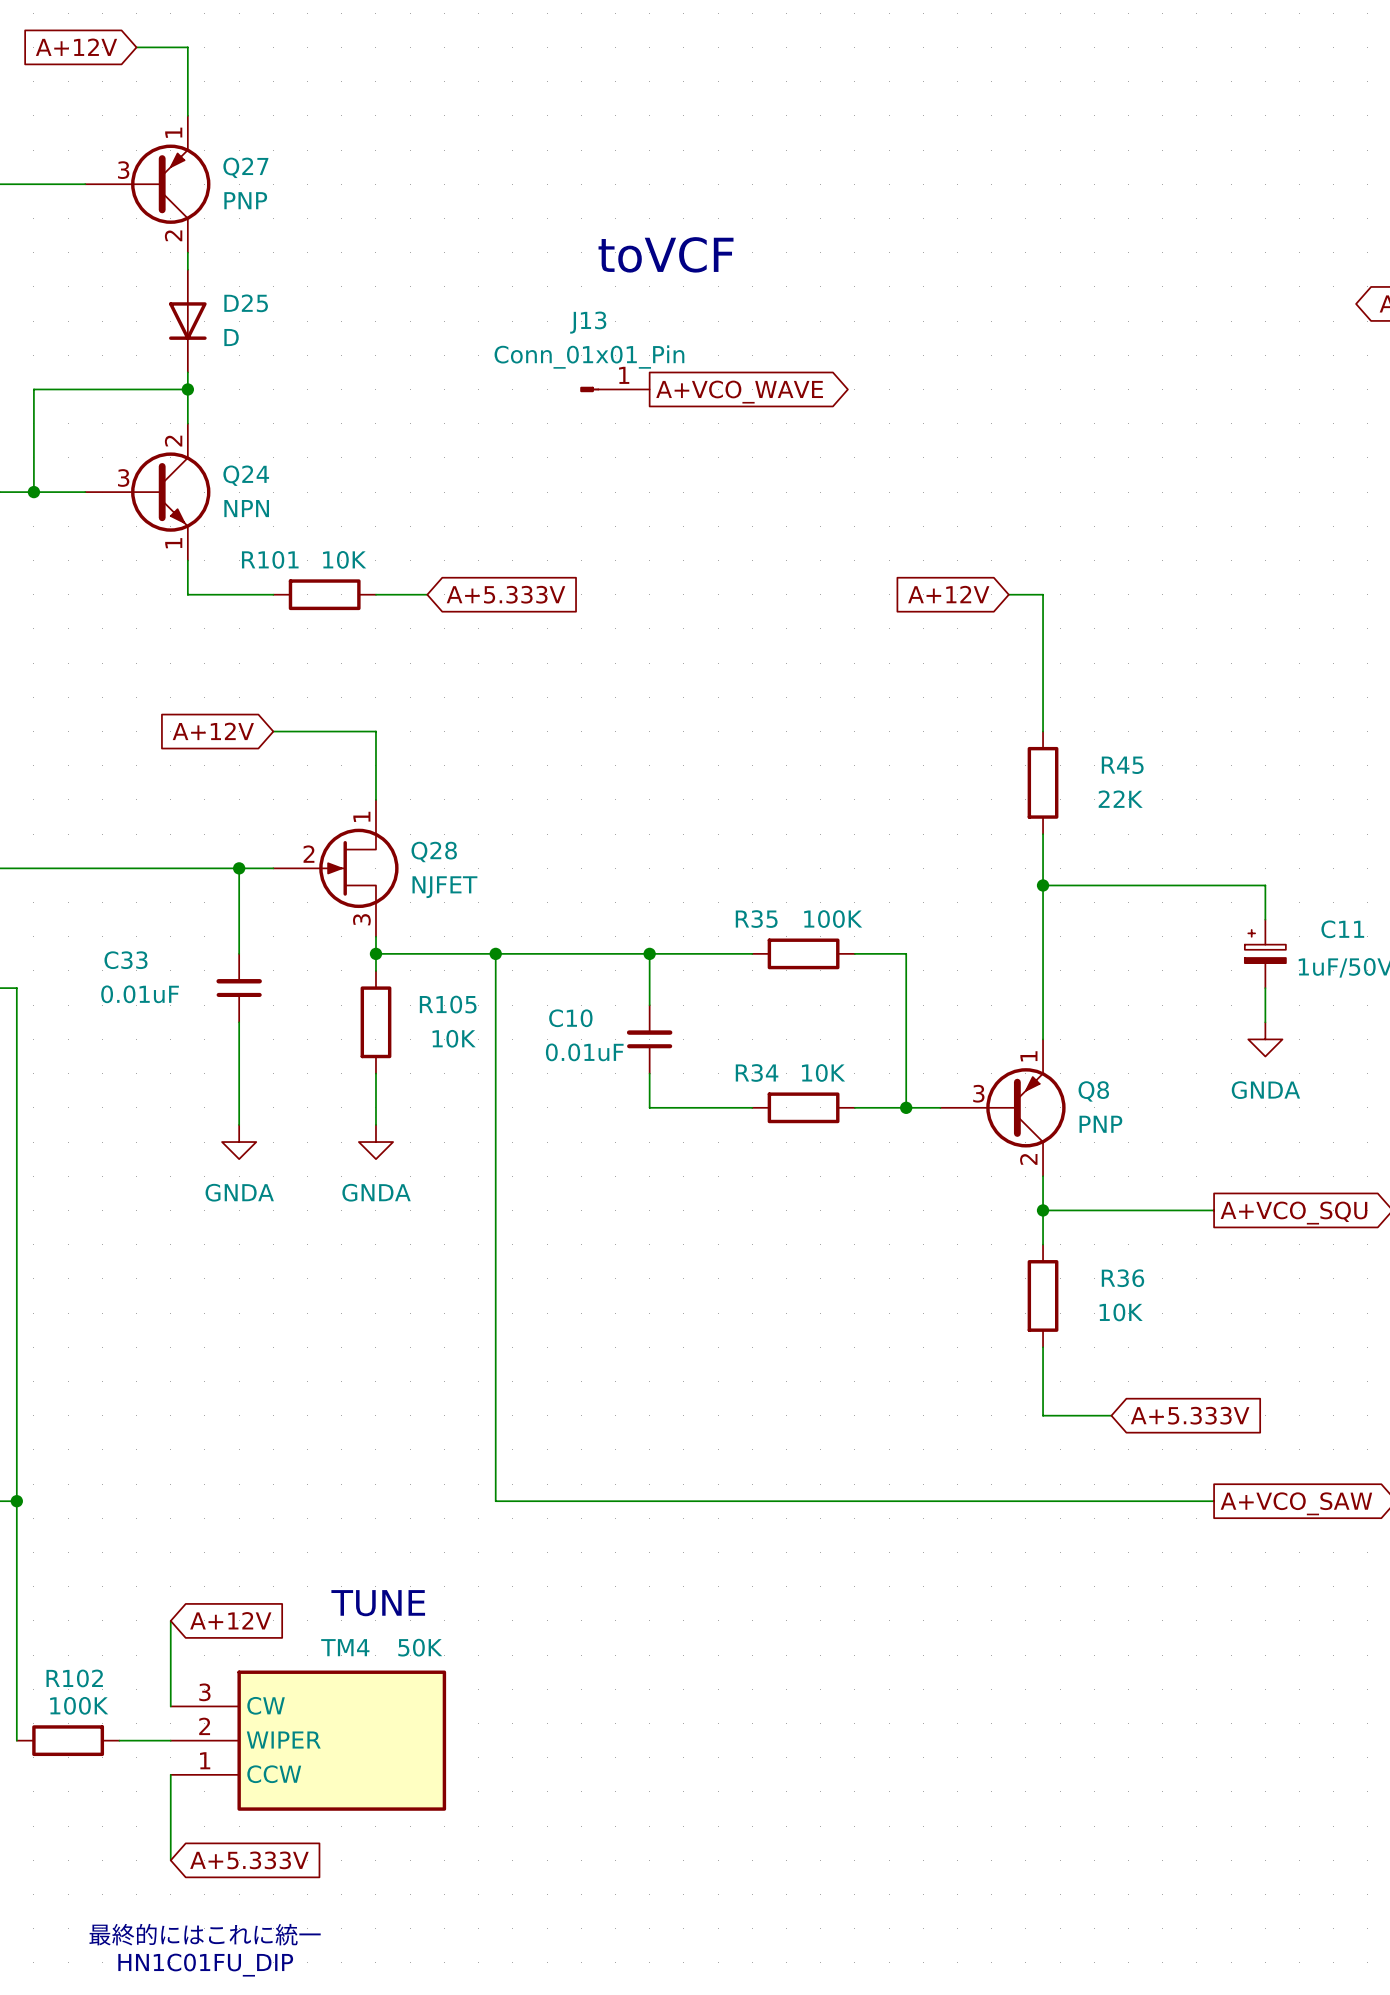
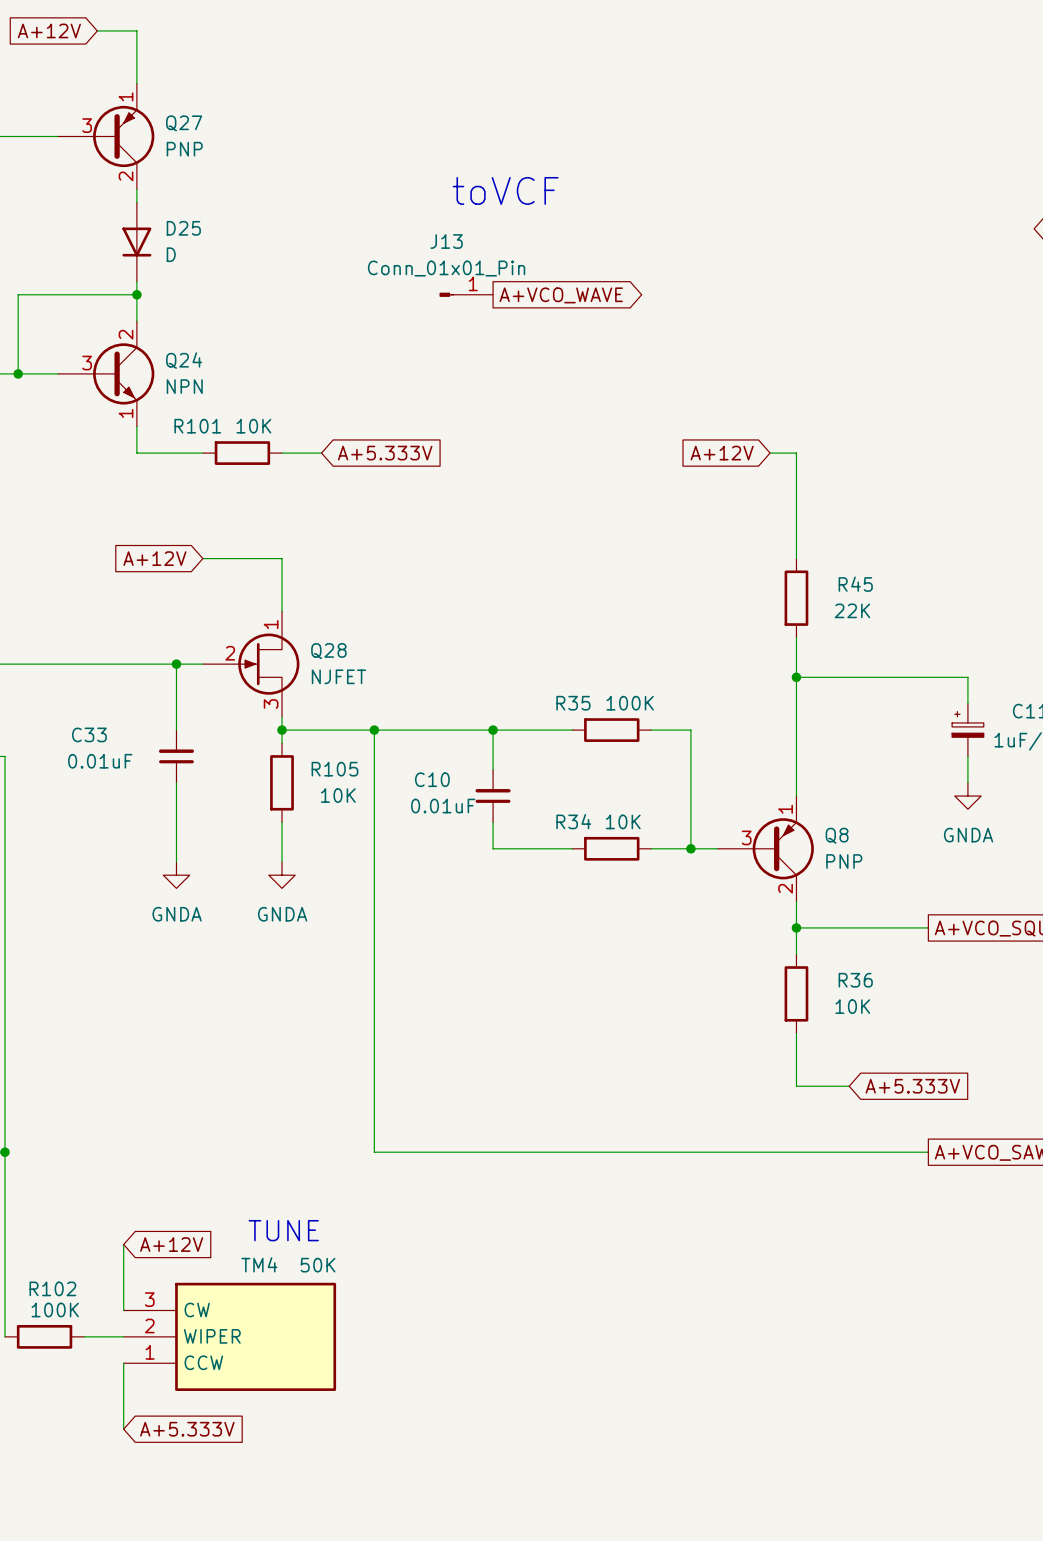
text: 最終的にはこれに統一 (205, 1934) -> none
text: HN1C01FU_DIP (205, 1965) -> none

